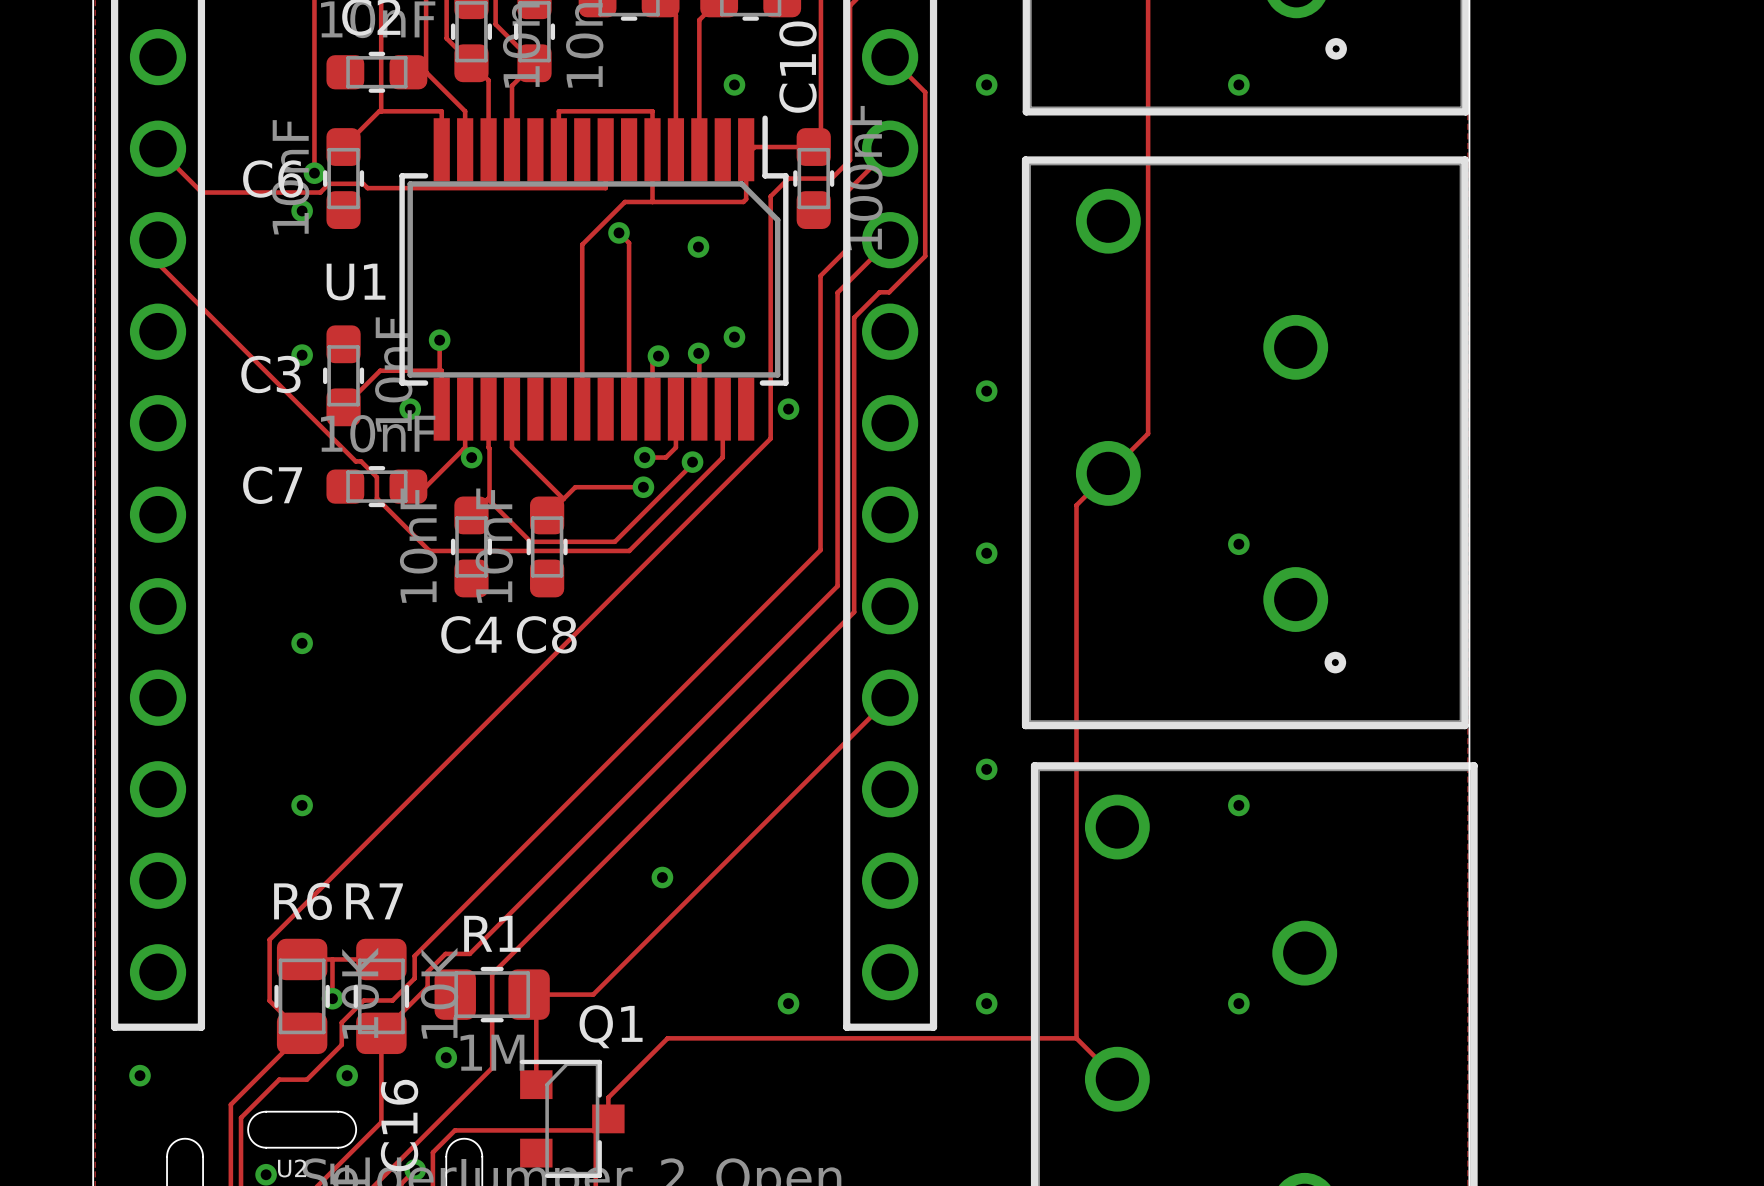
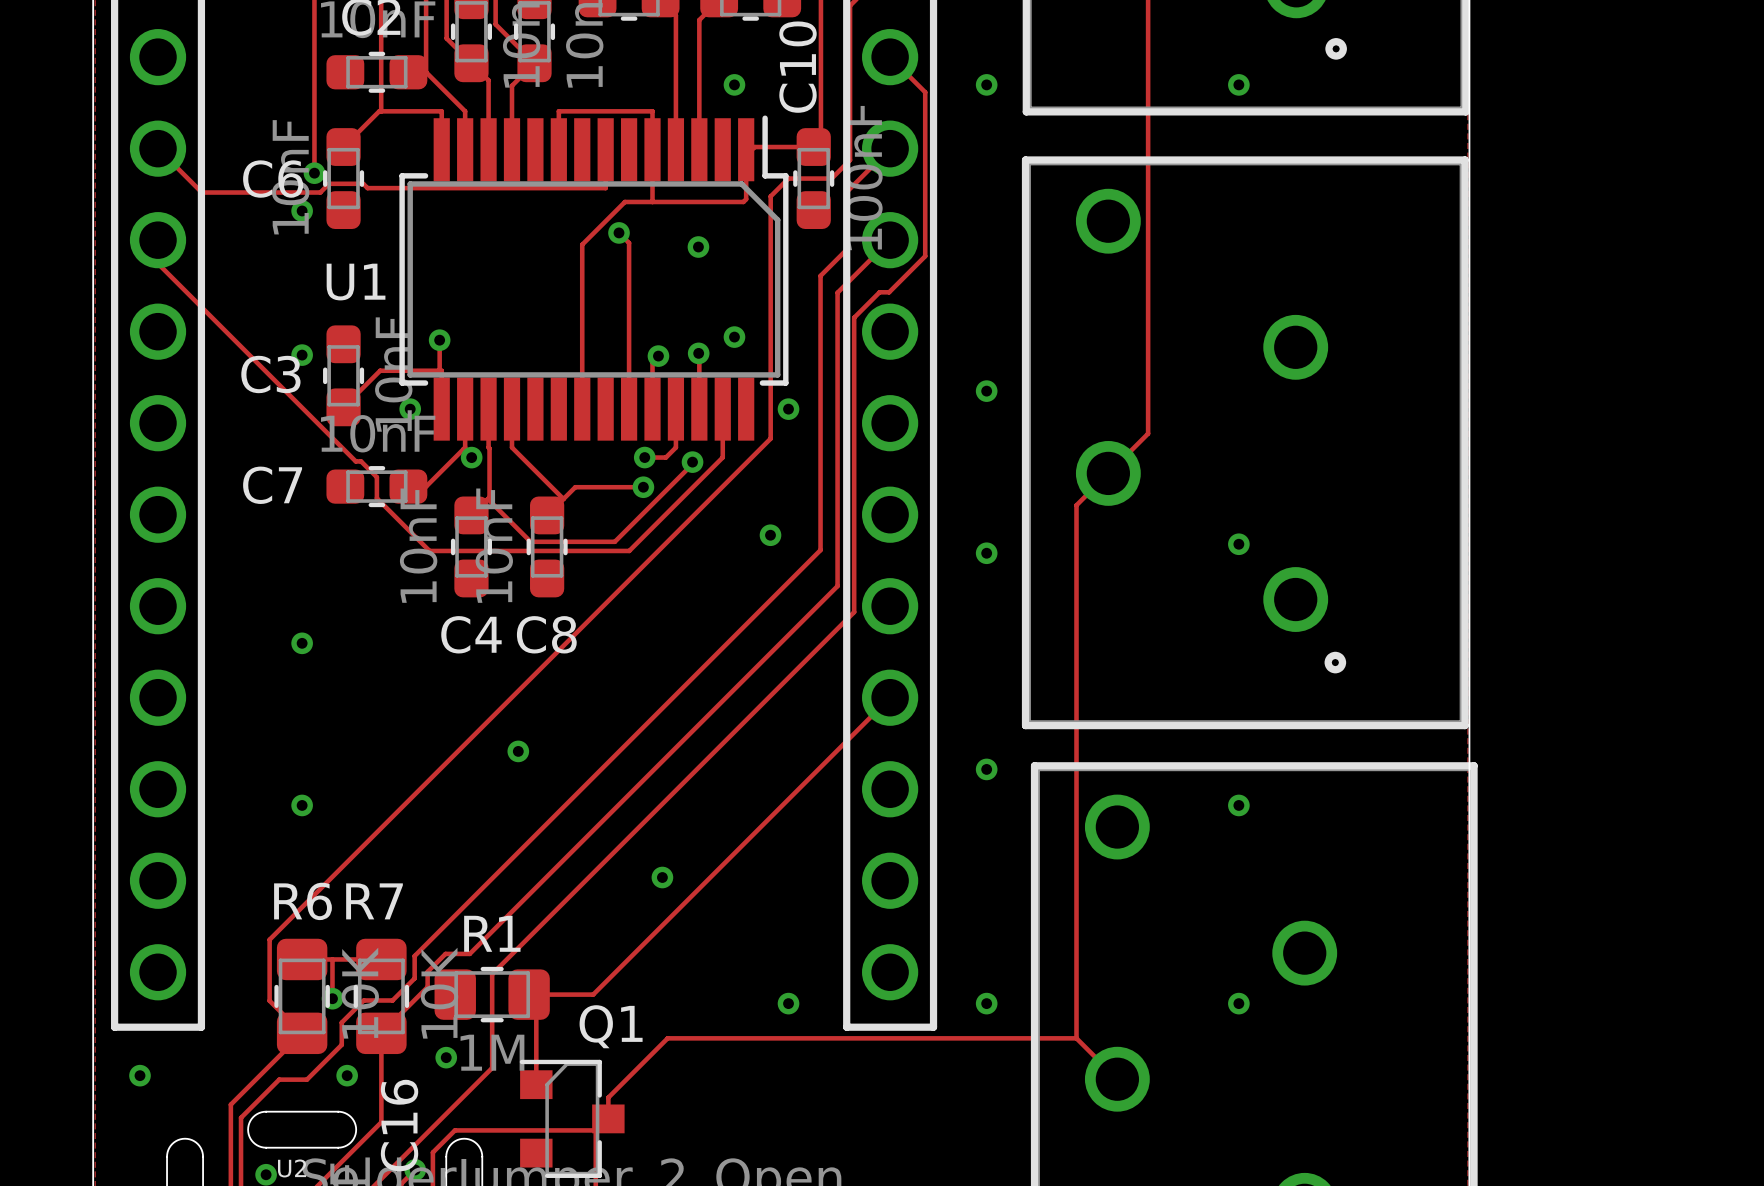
via: none -> (770, 535)
via: none -> (518, 751)

